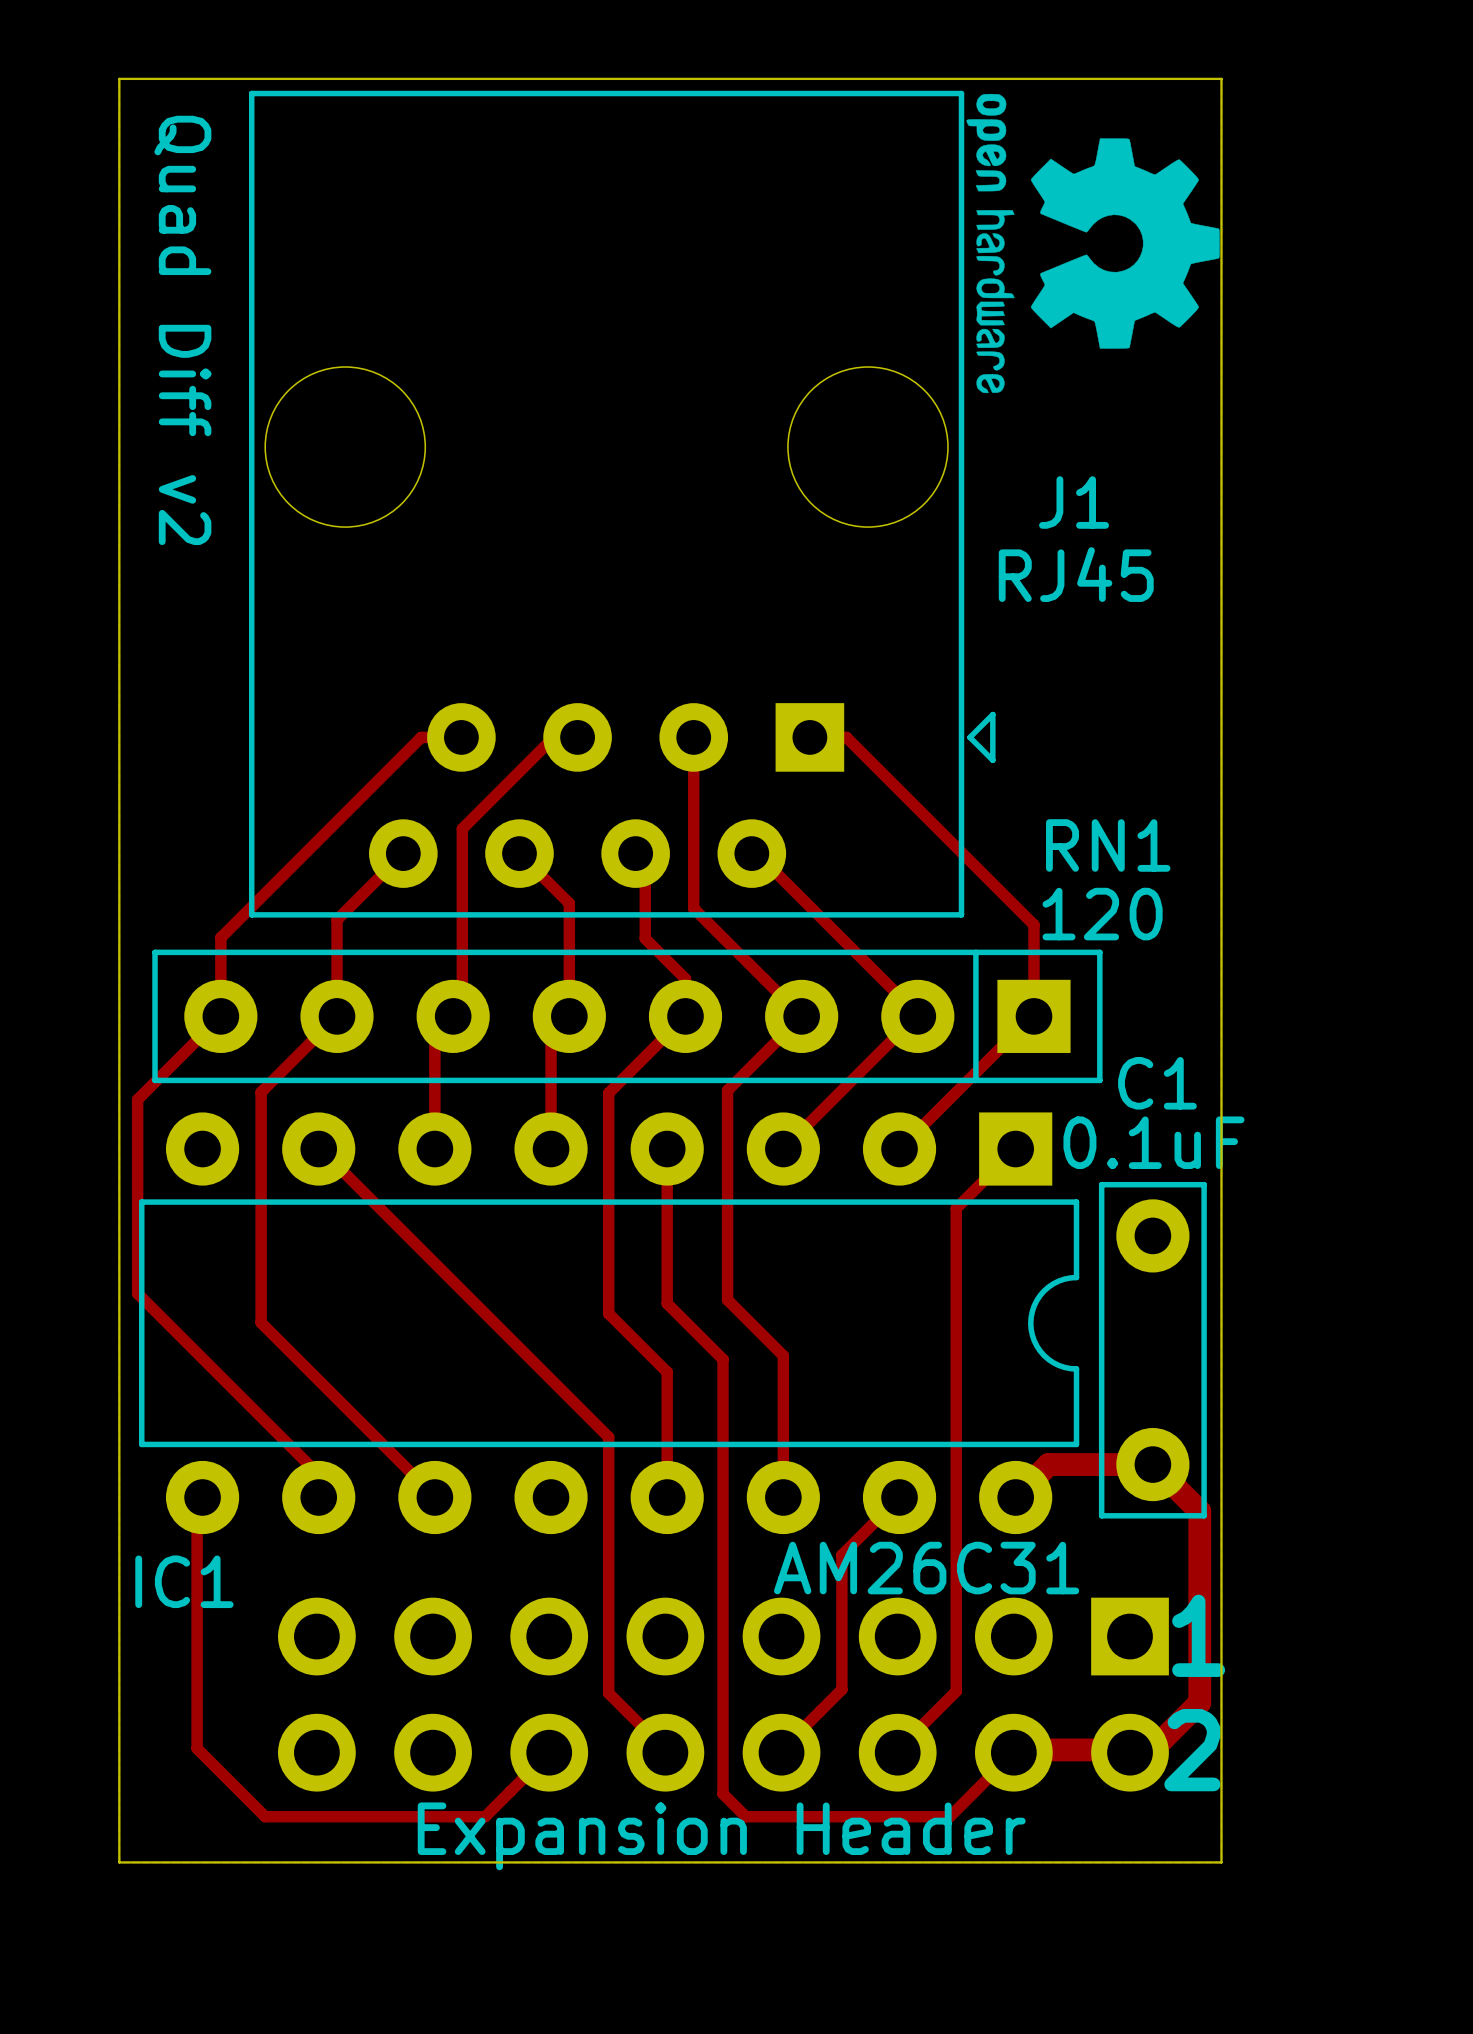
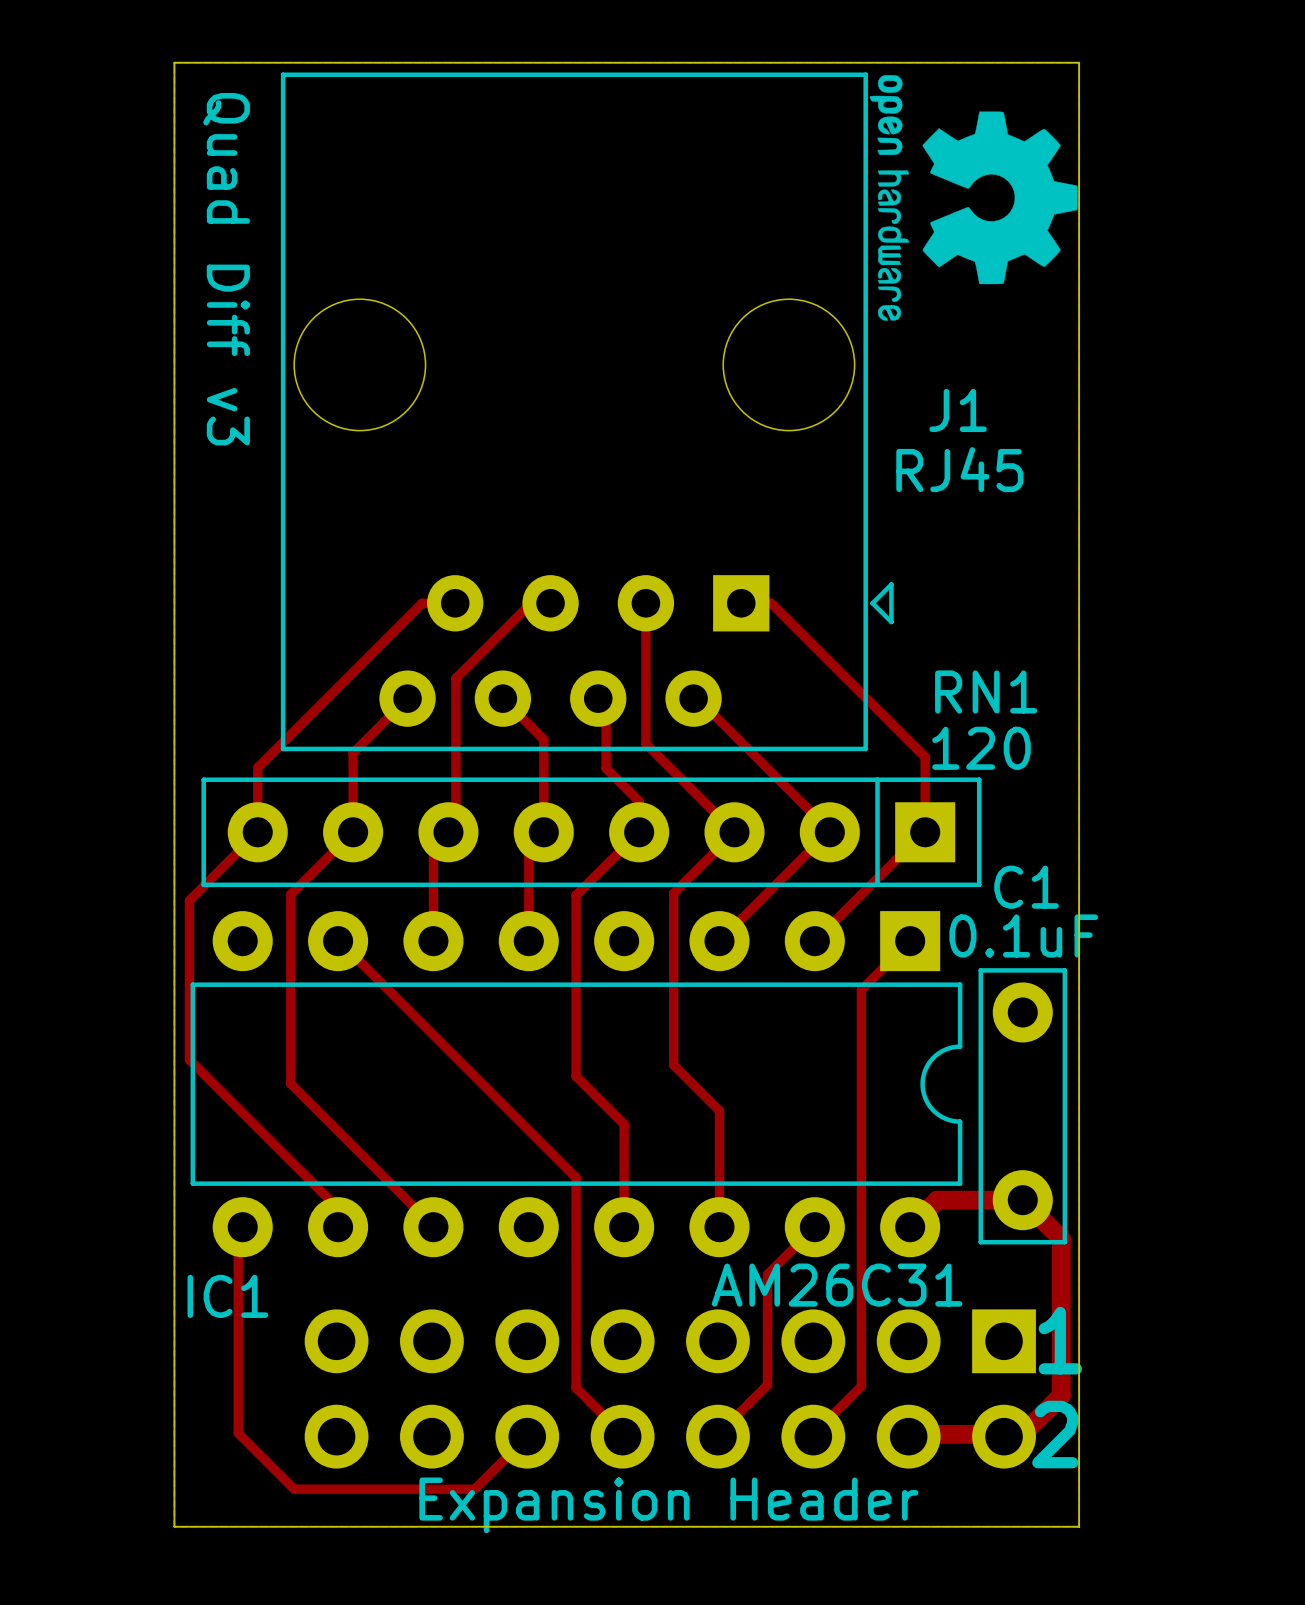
text: Quad Diff v2 (182, 330) -> Quad Diff v3 (226, 269)
top track: (667, 1149) (667, 1303) (723, 1359) (723, 1793) (745, 1816) (949, 1816) (1013, 1752) -> none

